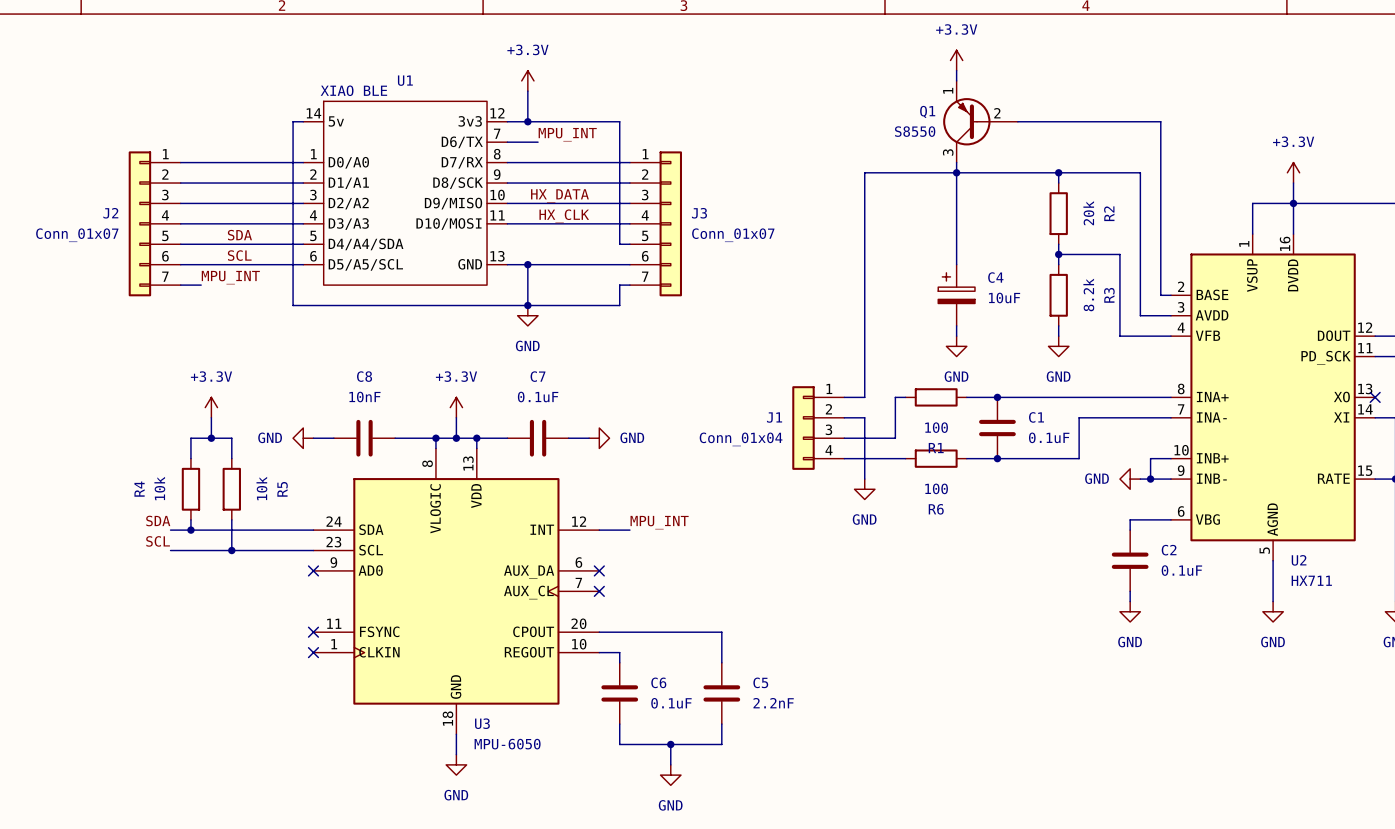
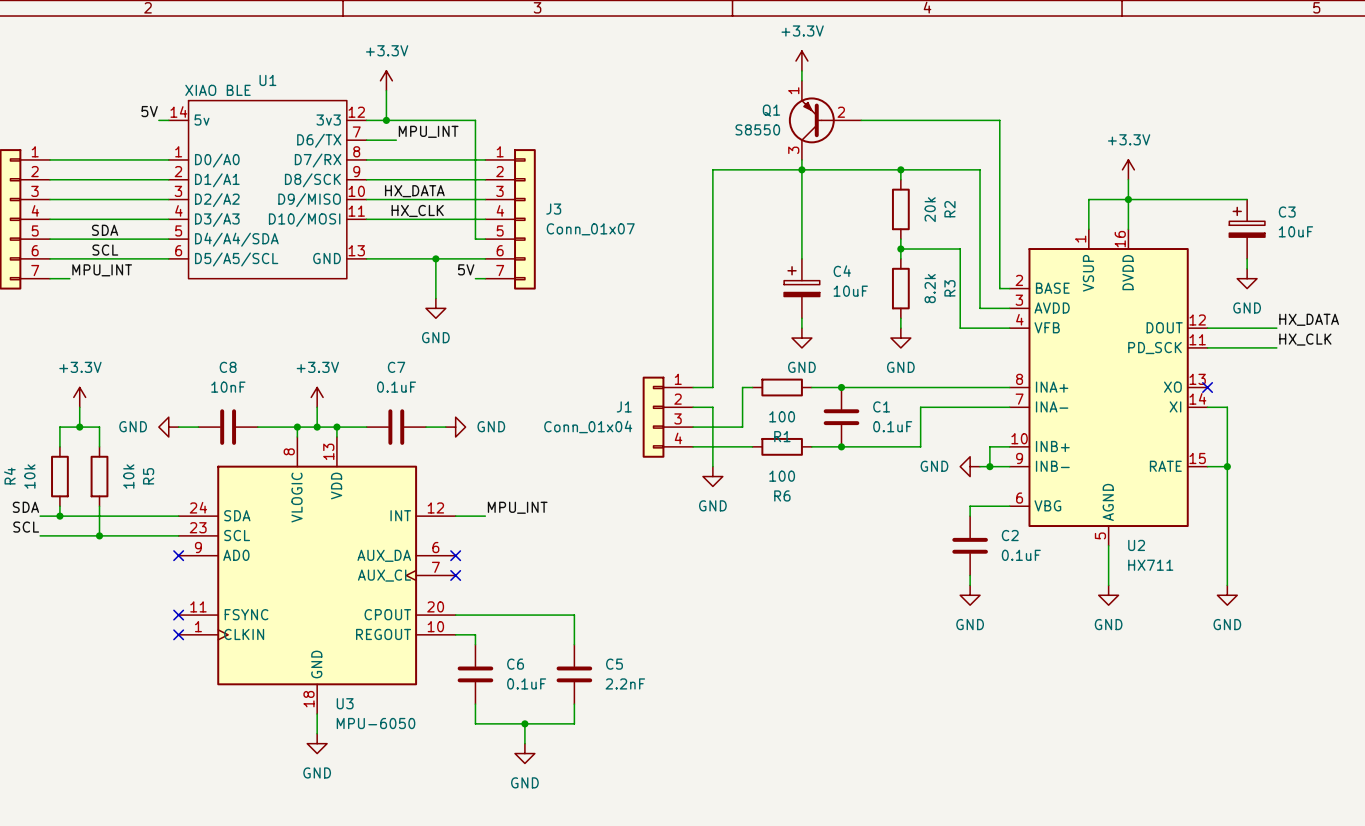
label: none -> 5V (149, 111)
wire: (293, 121) (293, 305) (619, 305) (619, 285) -> none
wire: (527, 264) (527, 305) -> (435, 258) (435, 298)
junction: (527, 264) -> none
junction: none -> (435, 258)
label: none -> 5V (466, 269)
junction: (527, 305) -> none
power symbol position: GND (527, 315) -> GND (435, 308)

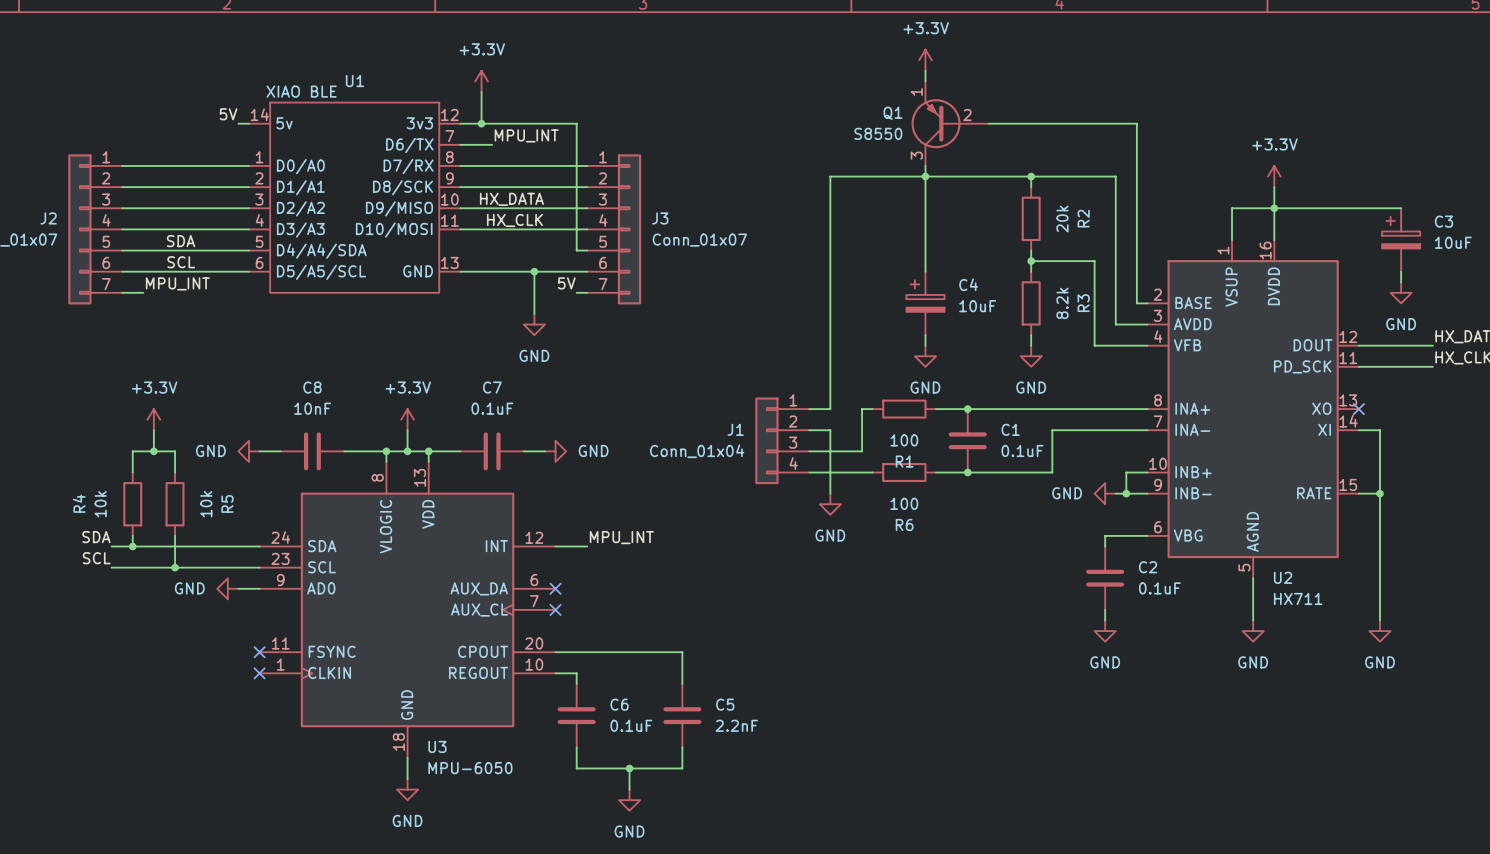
power symbol: none -> GND (227, 588)
wire: none -> (238, 588) (259, 588)
no-connect mark: (178, 555) -> none

